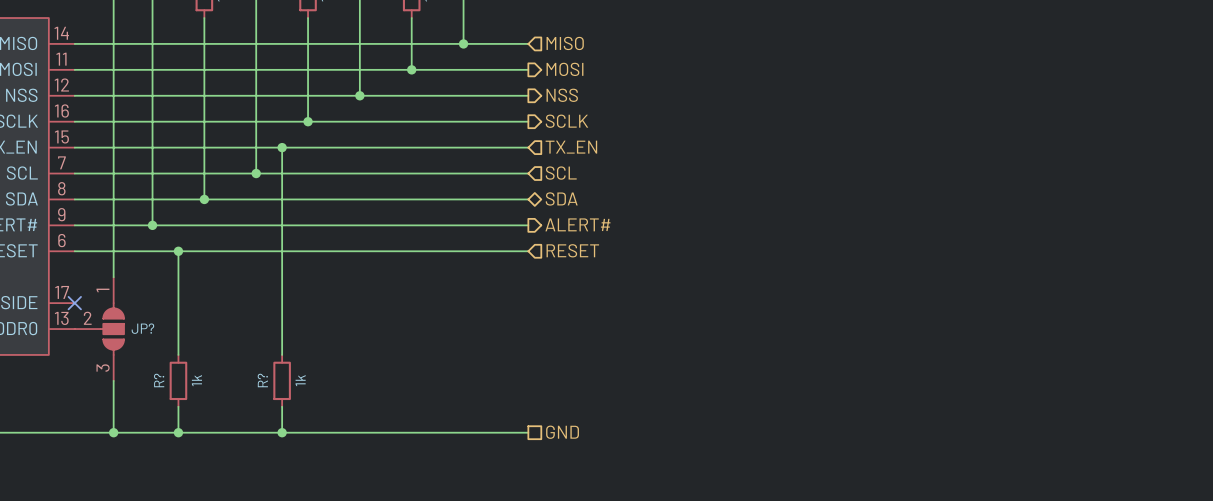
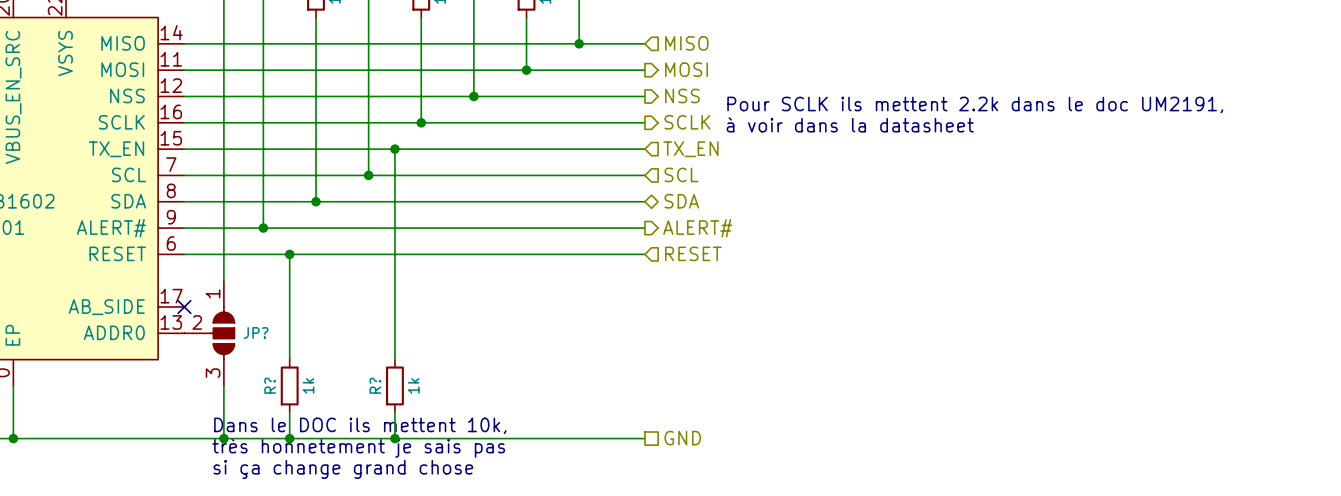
text: none -> Pour SCLK ils mettent 2.2k dans le doc UM2191, (975, 104)
text: none -> à voir dans la datasheet (850, 124)
text: none -> Dans le DOC ils mettent 10k, (360, 425)
text: none -> très honnetement je sais pas (358, 447)
text: none -> si ça change grand chose (343, 469)

